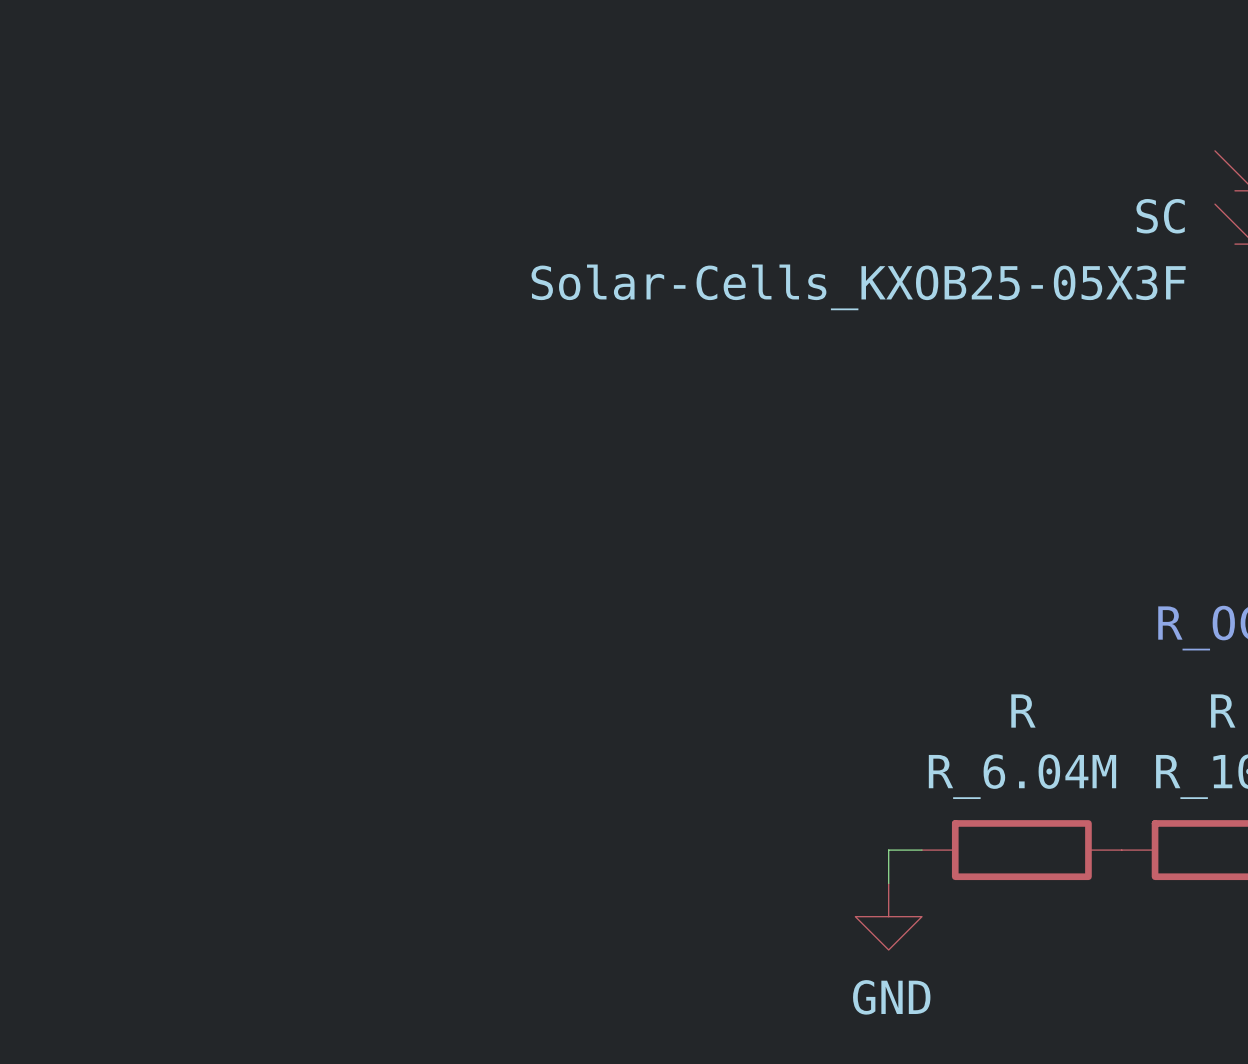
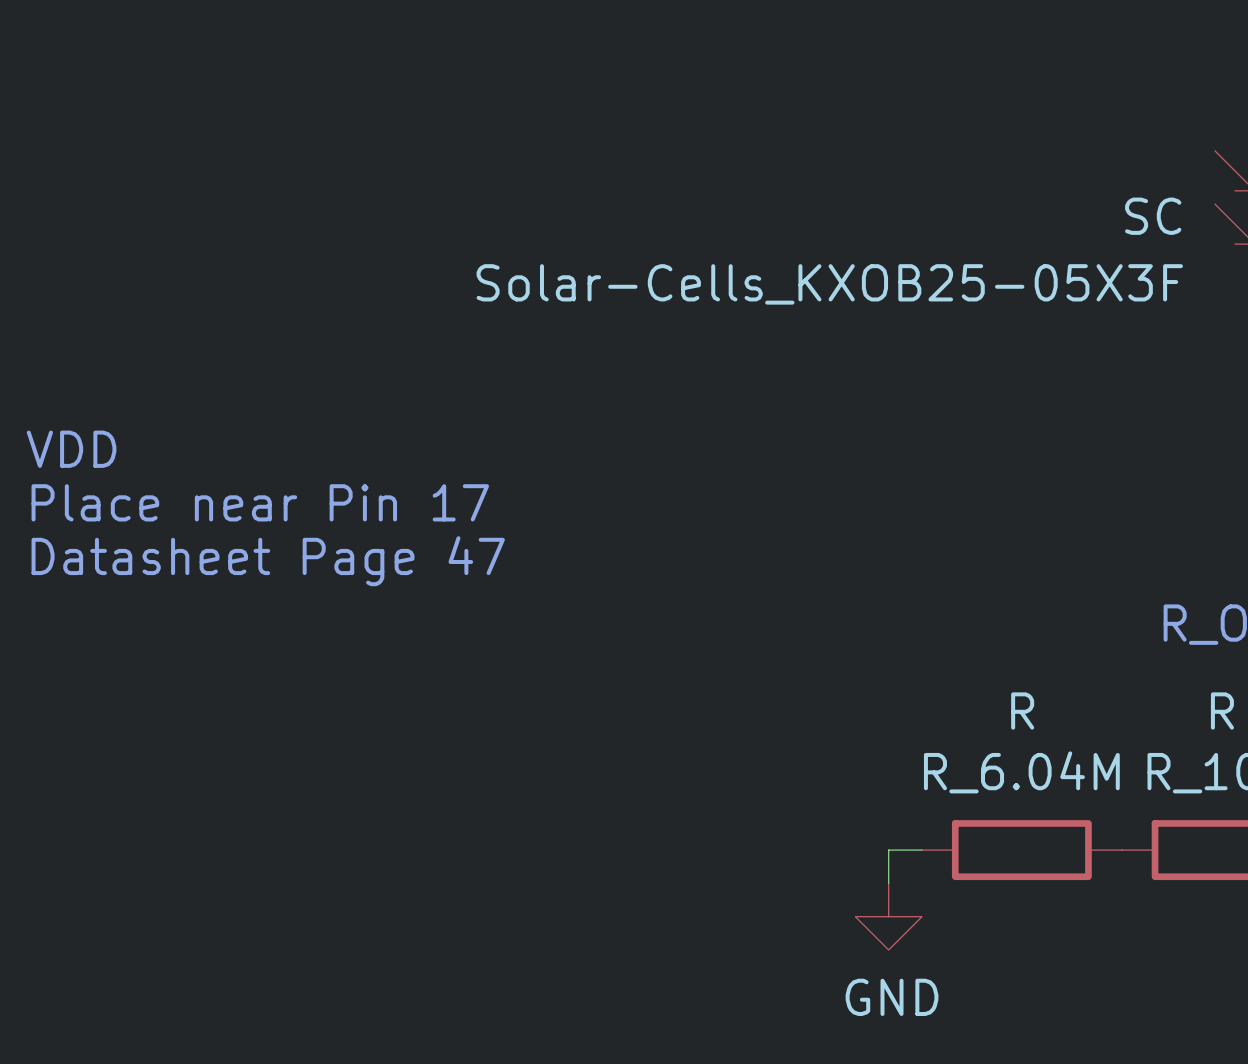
text: none -> VDD (71, 449)
text: none -> Place near Pin 17 (260, 502)
text: none -> Datasheet Page 47 (268, 561)

